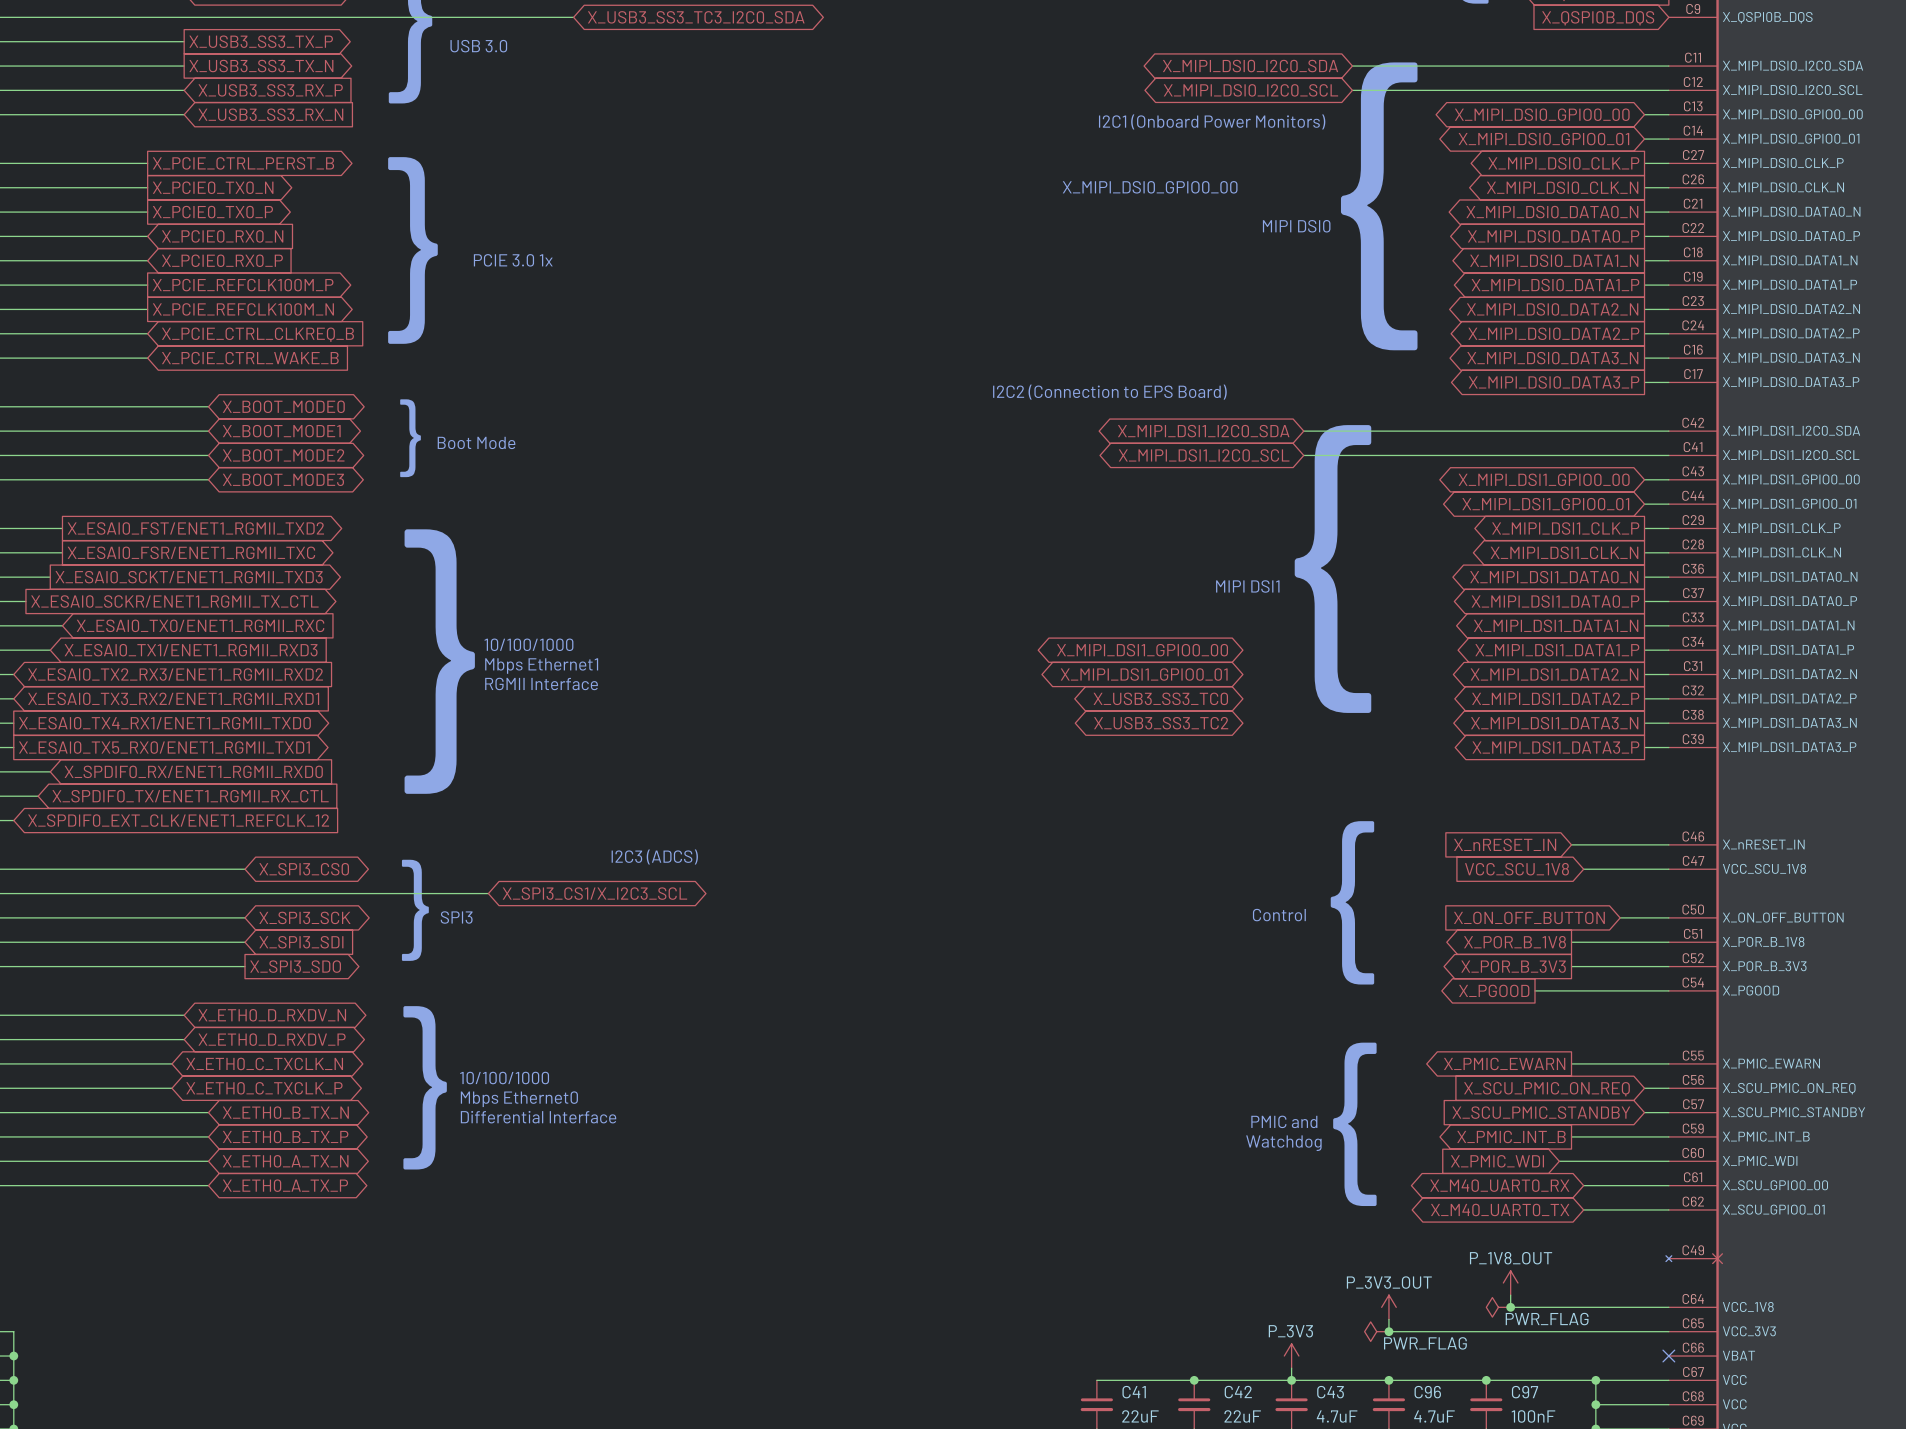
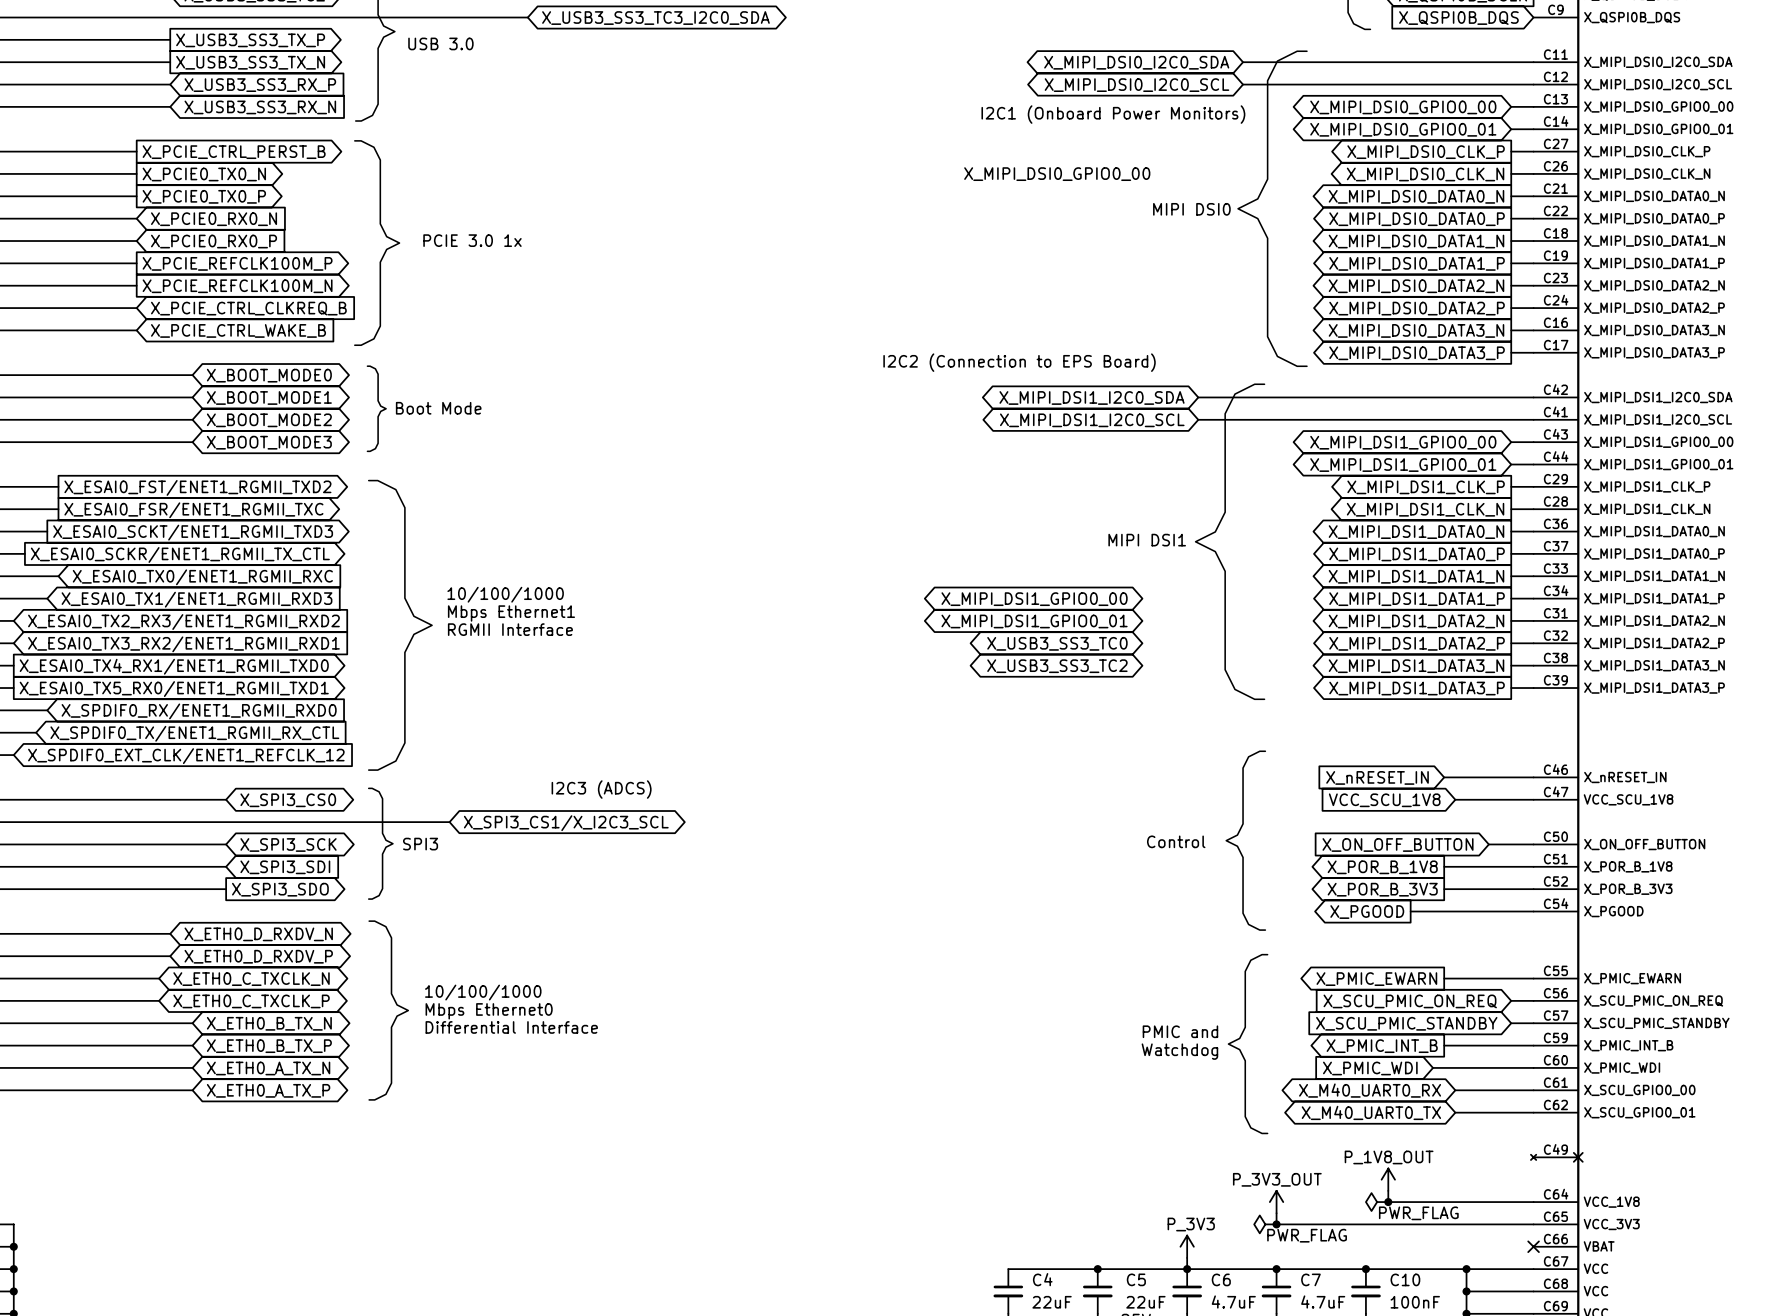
C41 name: C41 (1134, 1392) -> C4 (1042, 1279)
C42 name: C42 (1238, 1392) -> C5 (1136, 1279)
C43 name: C43 (1330, 1392) -> C6 (1221, 1279)
C96 name: C96 (1427, 1392) -> C7 (1310, 1279)
C97 name: C97 (1525, 1392) -> C10 (1405, 1279)

